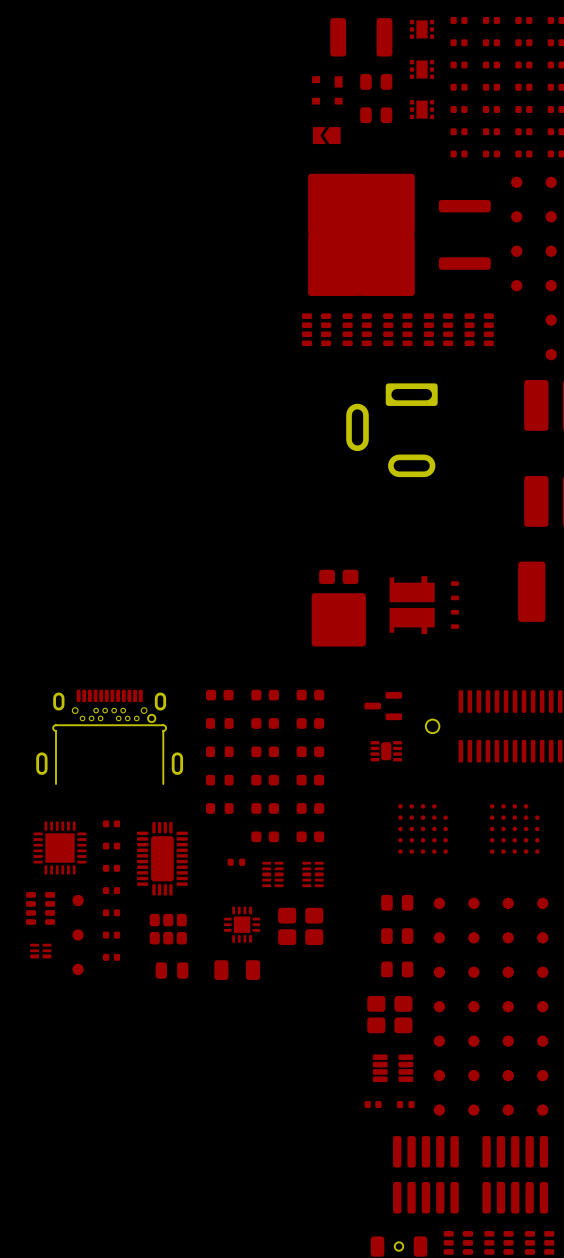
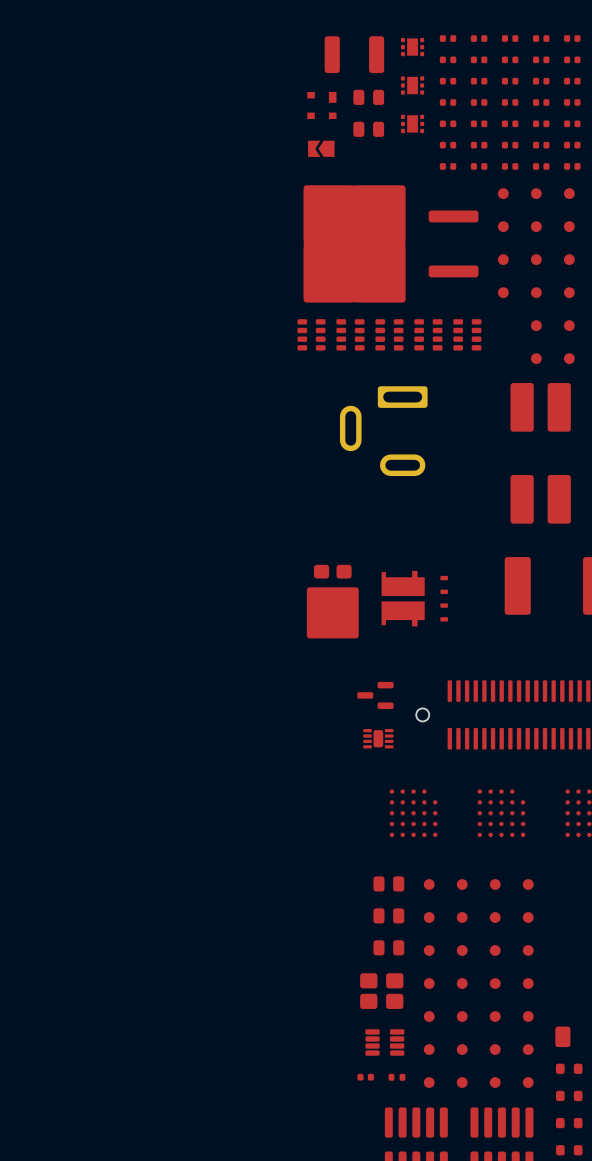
part: (219, 695) -> none
part: (265, 695) -> none
part: (310, 695) -> none
part: (219, 723) -> none
part: (265, 723) -> none
part: (310, 723) -> none
part: (109, 736) -> none
part: (219, 751) -> none
part: (265, 751) -> none
part: (310, 751) -> none
part: (219, 780) -> none
part: (265, 780) -> none
part: (310, 780) -> none
part: (219, 808) -> none
part: (265, 808) -> none
part: (310, 808) -> none
part: (111, 823) -> none
part: (265, 836) -> none
part: (310, 836) -> none
part: (111, 846) -> none
part: (60, 848) -> none
part: (162, 858) -> none
part: (236, 862) -> none
part: (111, 868) -> none
part: (272, 874) -> none
part: (313, 874) -> none
part: (111, 890) -> none
part: (78, 900) -> none
part: (40, 908) -> none
part: (111, 912) -> none
part: (242, 924) -> none
part: (300, 926) -> none
part: (168, 929) -> none
part: (78, 934) -> none
part: (111, 935) -> none
part: (40, 951) -> none
part: (111, 957) -> none
part: (78, 969) -> none
part: (172, 970) -> none
part: (237, 970) -> none

